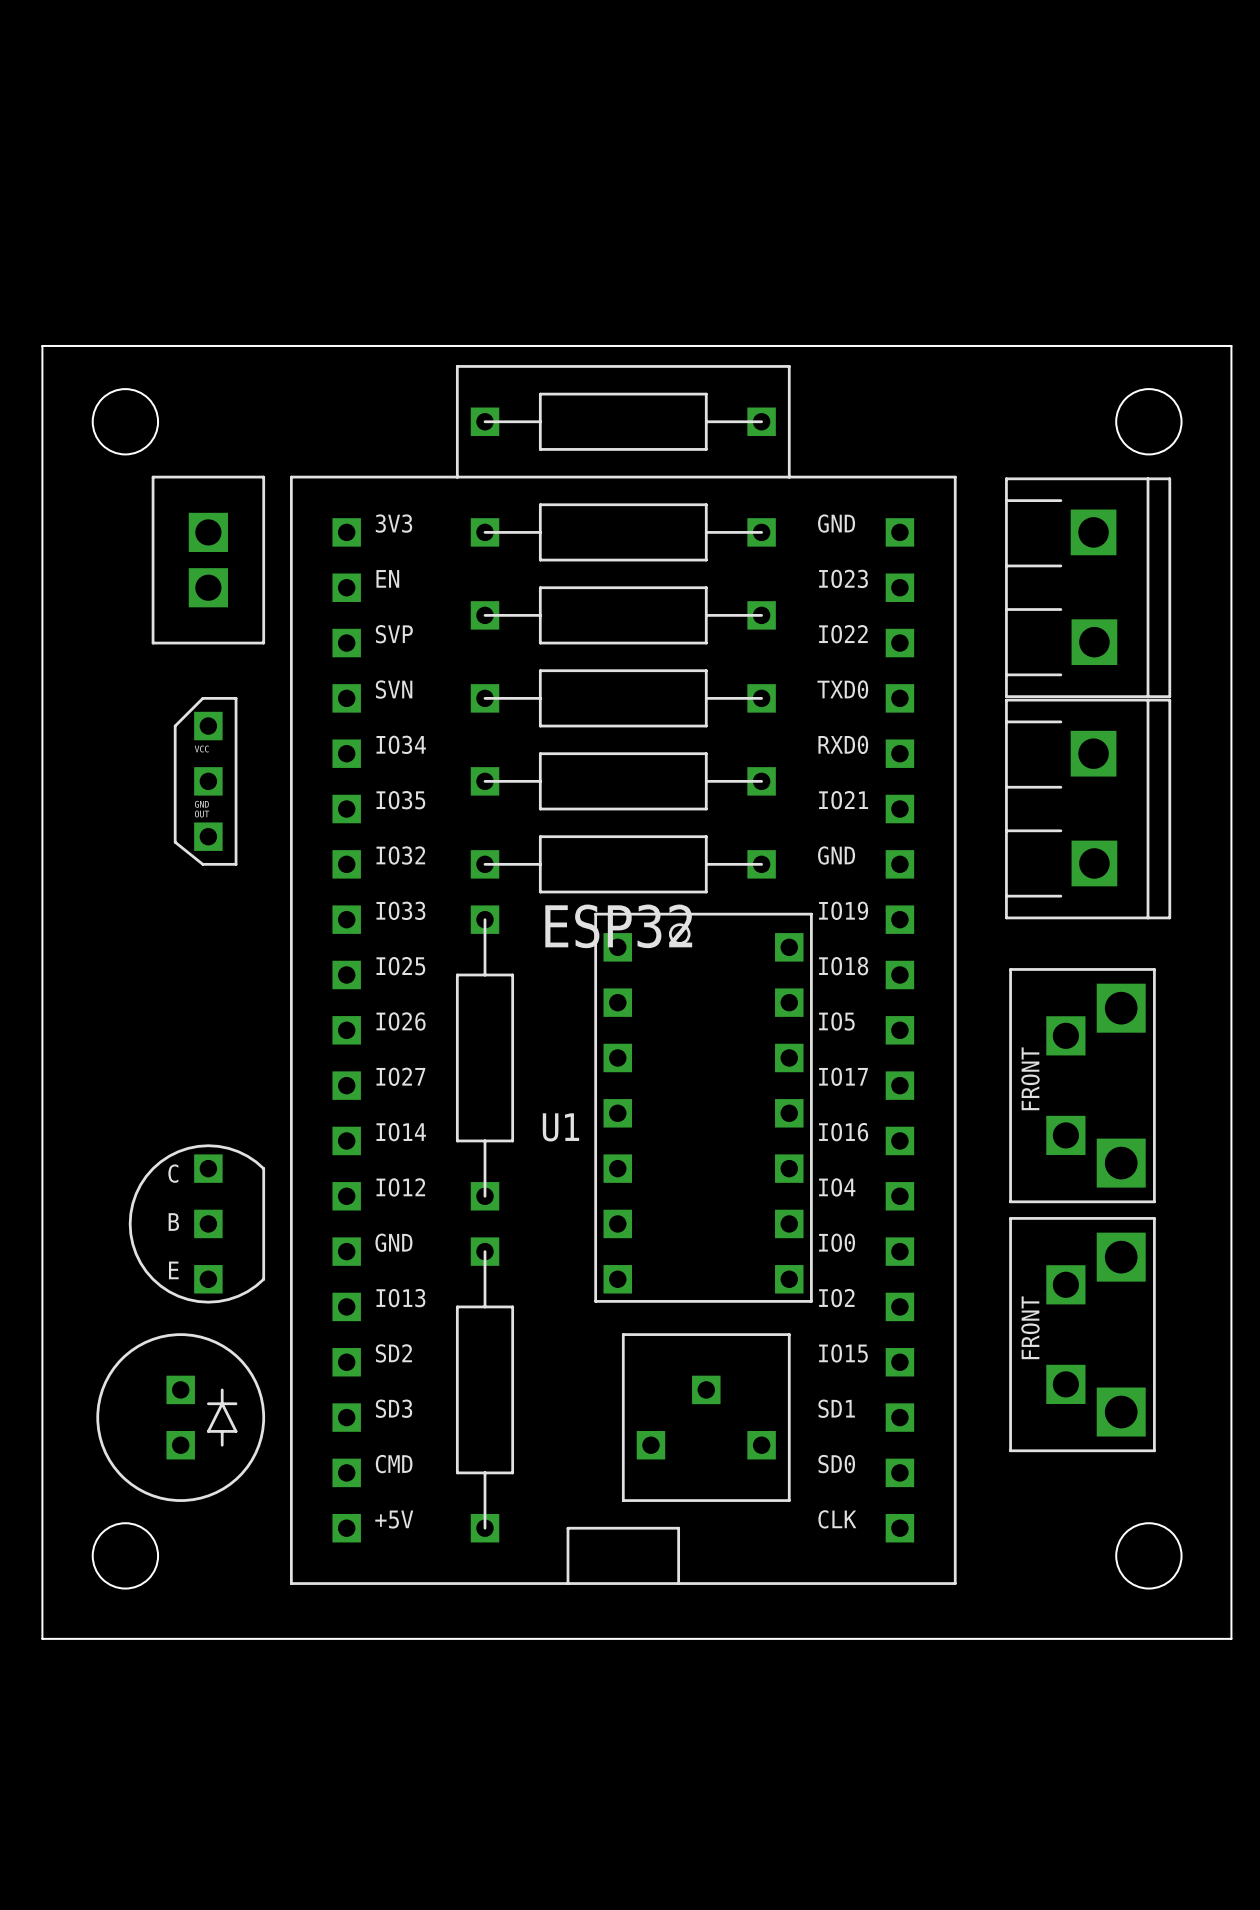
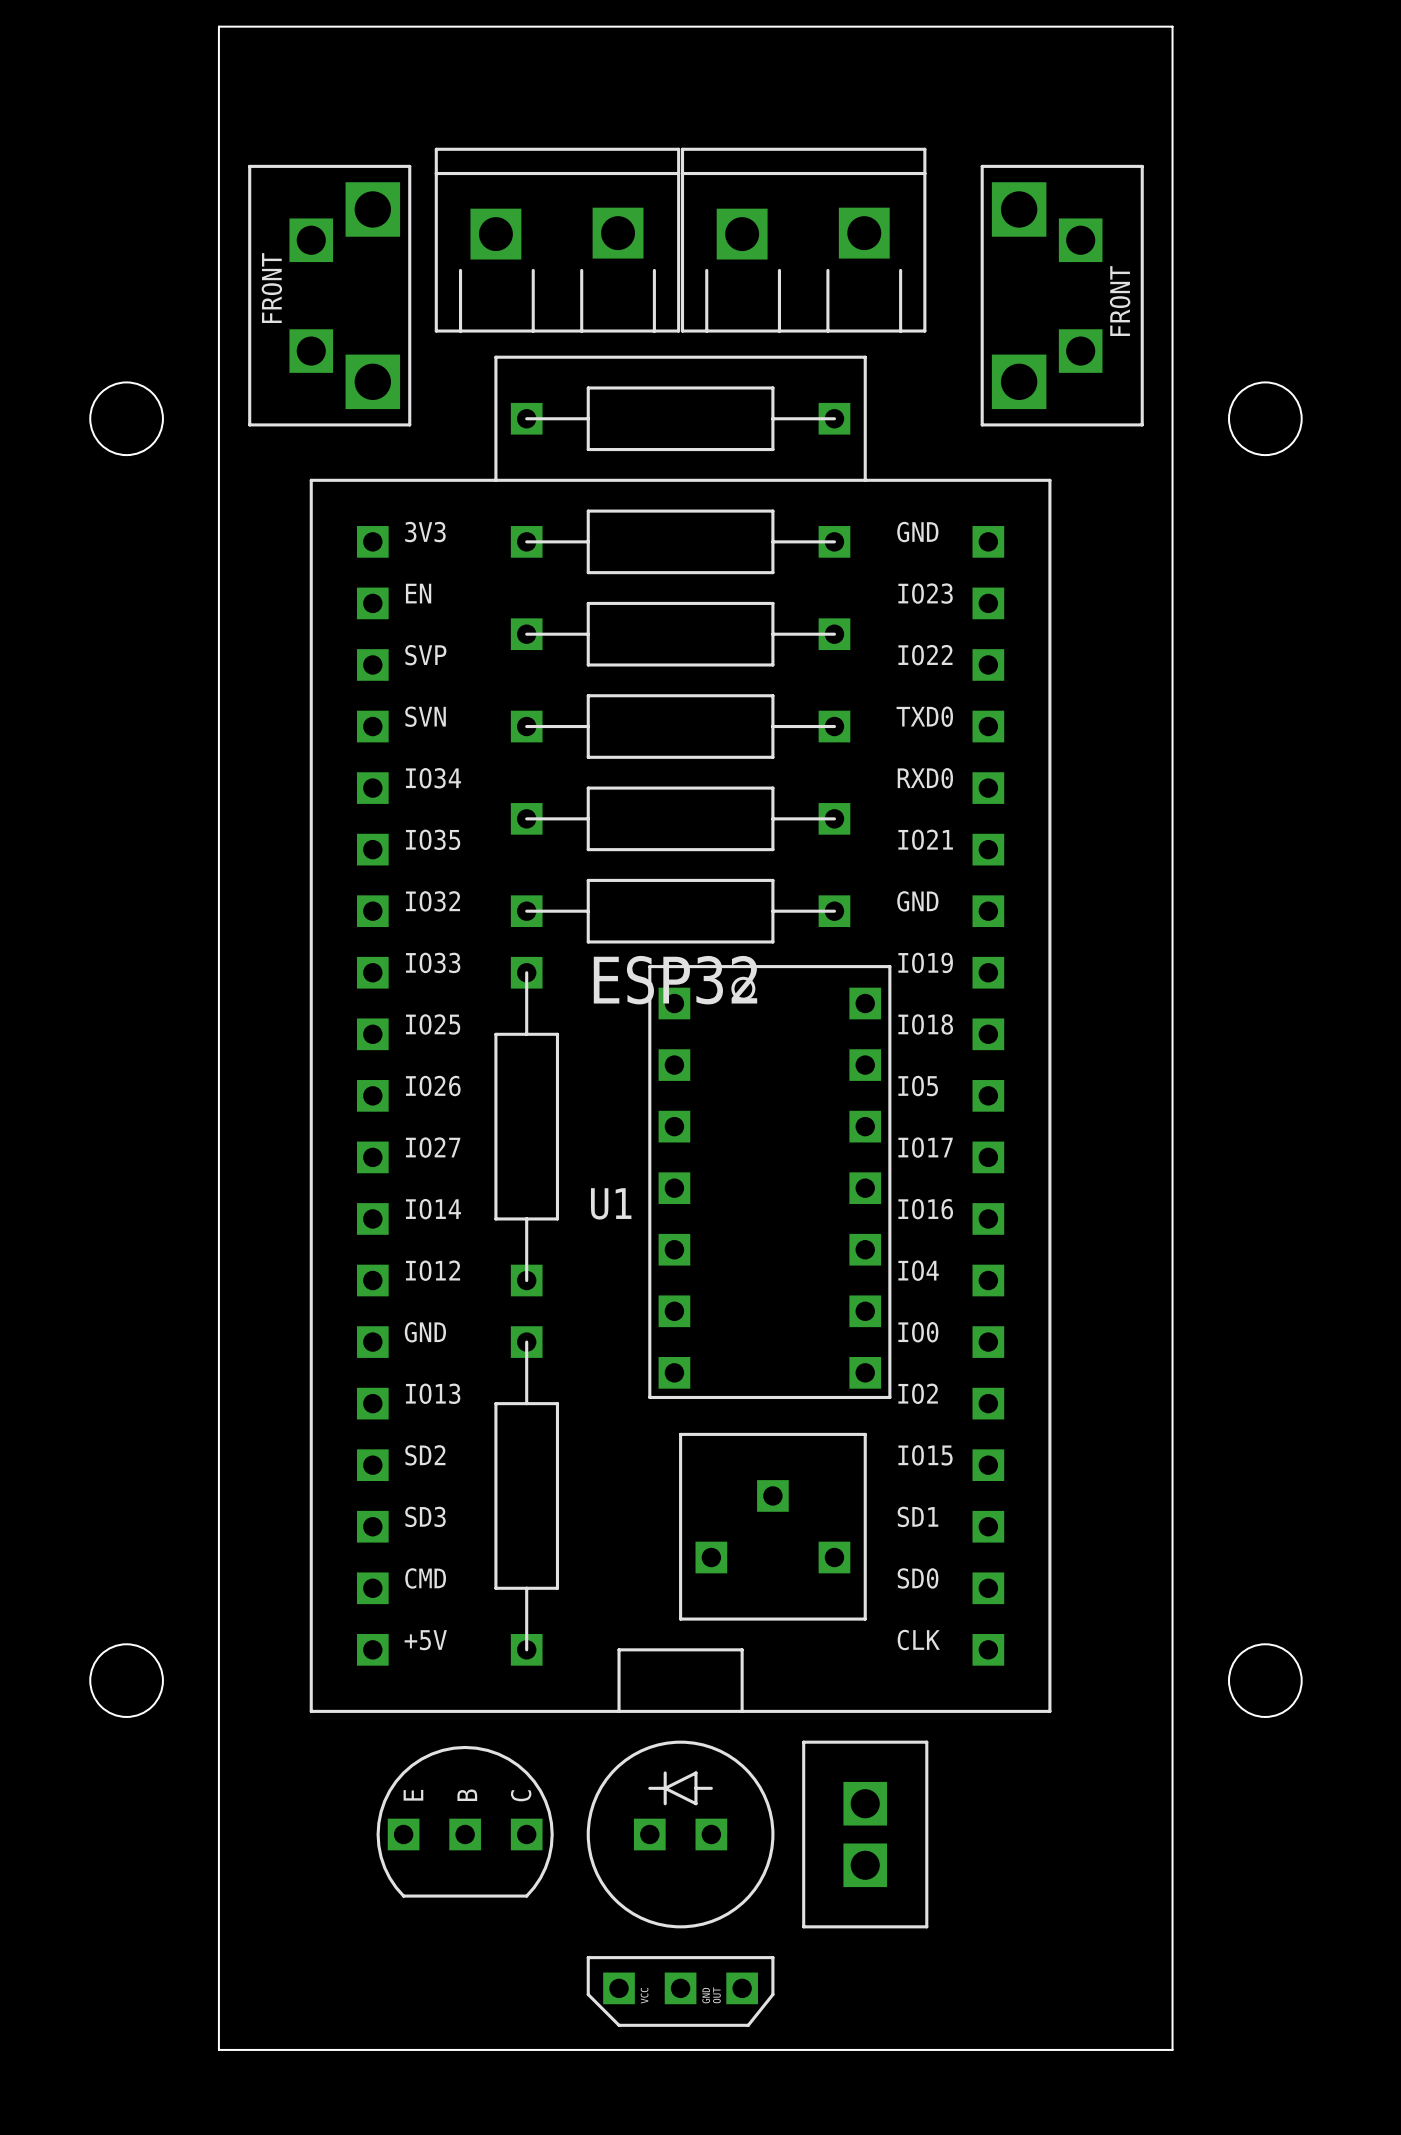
part: none -> (557, 240)
part: none -> (803, 240)
part: none -> (329, 295)
part: none -> (1062, 295)
board edge: (42, 345) (1231, 345) (1231, 1638) (42, 1638) (42, 345) -> (218, 26) (218, 2049) (1172, 2049) (1172, 26) (218, 26)
part: (208, 560) -> none
part: (1088, 587) -> none
part: (205, 781) -> none
part: (1088, 809) -> none
part: (1082, 1085) -> none
part: (196, 1223) -> none
part: (1082, 1334) -> none
part rotation: 0° (180, 1417) -> 90° counterclockwise (680, 1834)
part position: (180, 1417) -> (680, 1834)
part: none -> (465, 1821)
part: none -> (865, 1834)
part: none -> (680, 1991)

